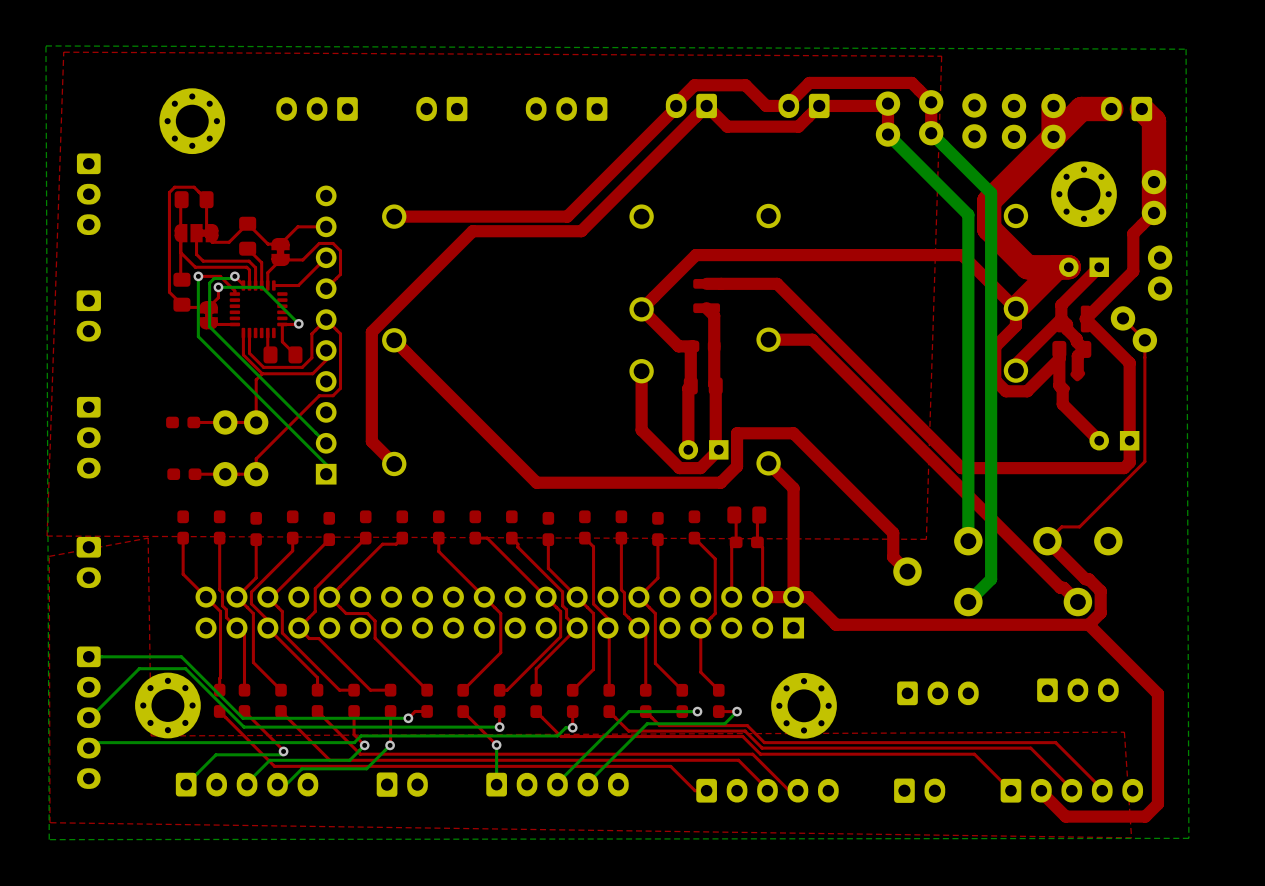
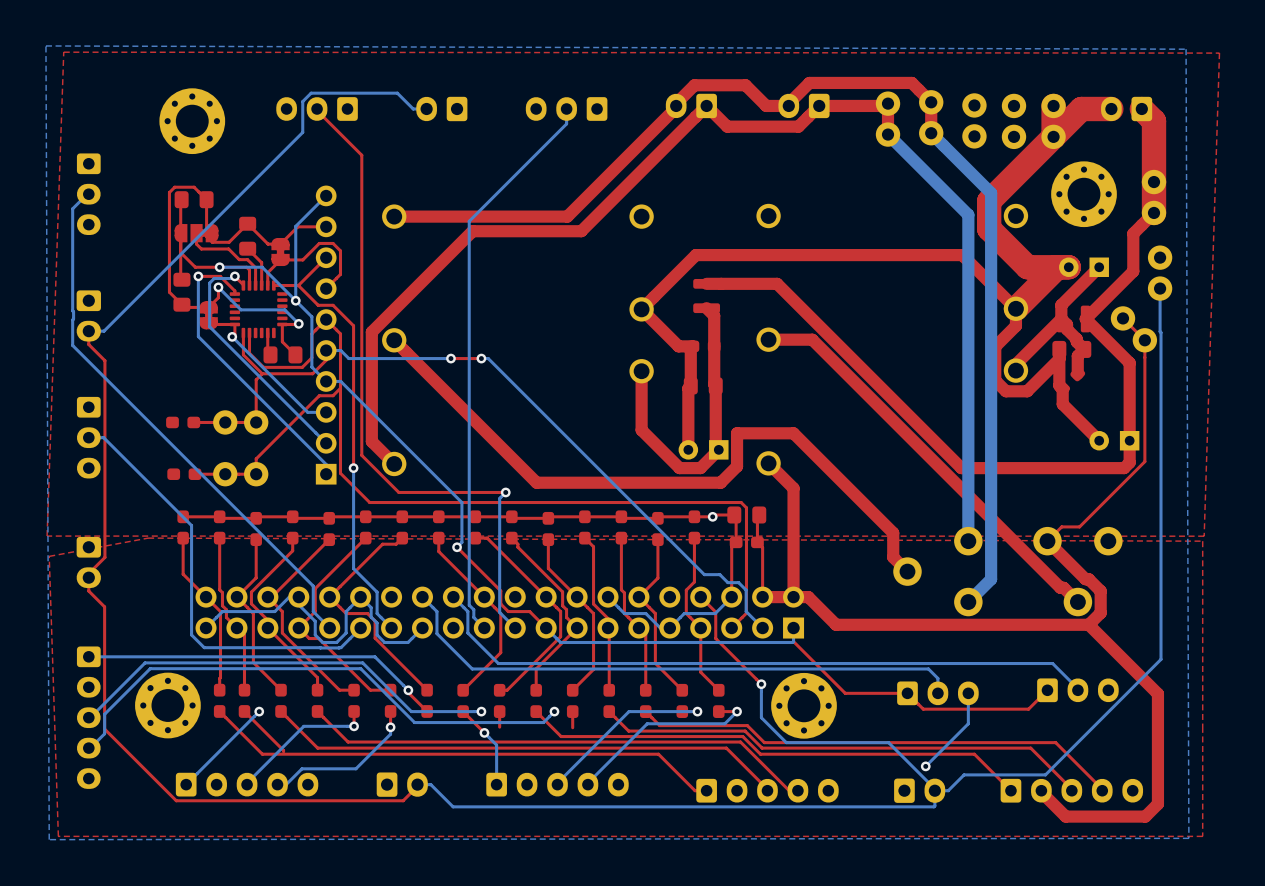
top zone outline: (63, 52) (941, 56) (926, 539) (47, 536) -> (63, 52) (1219, 53) (1204, 536) (47, 536)
top track: none -> (317, 108) (361, 155) (361, 455) (398, 492) (505, 492)
bottom track: none -> (426, 108) (413, 108) (397, 93) (311, 93) (302, 101) (302, 132) (104, 331) (88, 331)
bottom track: none -> (566, 108) (566, 123) (469, 221) (469, 605) (473, 609) (473, 617) (484, 628)
bottom track: none -> (88, 194) (72, 208) (72, 345) (313, 586) (313, 611) (329, 628)
bottom track: none -> (326, 195) (295, 226) (295, 300)
top track: (196, 244) (196, 254) (203, 261) (249, 261) -> (196, 244) (201, 248) (228, 248) (239, 259) (249, 261)
bottom track: none -> (219, 267) (262, 267) (311, 316) (311, 367) (326, 381) (340, 381) (461, 502) (461, 542) (457, 547)
via: none -> (219, 267)
top track: none -> (298, 285) (318, 305) (333, 305) (353, 325) (353, 468)
bottom track: (218, 287) (262, 287) (284, 309) -> (218, 287) (240, 309) (284, 309)
bottom track: none -> (1160, 288) (1161, 659) (1045, 774) (964, 774) (948, 790) (934, 790)
via: none -> (295, 300)
top track: none -> (234, 324) (234, 334) (232, 336)
top track: none -> (88, 331) (88, 344) (104, 360) (104, 557) (88, 573) (88, 591) (104, 606) (104, 729) (176, 800) (403, 800) (417, 784)
bottom track: none -> (232, 336) (307, 412) (326, 412)
via: none -> (232, 336)
bottom track: none -> (326, 350) (340, 350) (348, 358) (450, 358)
via: none -> (450, 358)
top track: none -> (481, 358) (450, 358)
bottom track: none -> (481, 358) (488, 358) (704, 574) (719, 574) (727, 582) (738, 582) (746, 590) (746, 611) (762, 628)
via: none -> (481, 358)
top track: none -> (340, 388) (340, 473) (369, 502) (741, 502) (746, 507) (746, 613) (731, 628)
bottom track: none -> (88, 437) (103, 437) (191, 525) (191, 634) (204, 647) (338, 647) (360, 628)
bottom track: none -> (353, 468) (353, 568) (377, 592) (377, 613) (391, 628)
via: none -> (353, 468)
bottom track: none -> (505, 492) (499, 498) (499, 612) (515, 628)
via: none -> (505, 492)
top track: none -> (734, 514) (657, 518) (183, 516)
via: none -> (712, 516)
top zone outline: (148, 538) (151, 735) (1124, 732) (1131, 837) (49, 822) (49, 556) -> (148, 538) (1202, 541) (1202, 836) (58, 836) (49, 556)
top track: (694, 538) (715, 558) (715, 613) (700, 628) -> (694, 538) (694, 582) (686, 590) (686, 613) (700, 628)
top track: none -> (457, 547) (500, 590) (500, 604) (508, 611) (529, 611) (546, 628)
via: none -> (457, 547)
bottom track: none -> (422, 597) (436, 611) (436, 633) (472, 668) (928, 668) (937, 678) (937, 693)
bottom track: none -> (453, 597) (467, 611) (467, 632) (498, 663) (1052, 663) (1077, 690)
top track: none -> (700, 597) (715, 612) (715, 638) (761, 684)
bottom track: none -> (731, 597) (715, 613) (684, 613) (669, 628) (660, 628) (645, 613) (624, 613) (608, 597)
bottom track: none -> (422, 628) (408, 642) (384, 642) (377, 634) (377, 623) (371, 617) (371, 607) (360, 597) (346, 611) (346, 632) (336, 642) (322, 642) (315, 634) (315, 621) (298, 604) (298, 597) (289, 597) (274, 611) (222, 611) (206, 628)
top track: none -> (793, 628) (793, 641) (845, 693) (907, 693) (923, 709) (1028, 709) (1047, 690)
bottom track: none -> (793, 628) (792, 642) (560, 642) (546, 628)
bottom track: (181, 656) (242, 718) (408, 718) -> (181, 656) (374, 656) (408, 690)
bottom track: none -> (139, 668) (145, 662) (362, 662) (411, 711) (481, 711)
bottom track: (150, 668) (139, 668) -> (150, 668) (104, 714) (104, 733) (95, 742)
bottom track: (185, 668) (244, 727) (499, 727) -> (185, 668) (360, 668) (414, 722) (543, 722) (554, 711)
bottom track: none -> (761, 684) (761, 717) (786, 742) (888, 742) (934, 788) (934, 805) (453, 806) (430, 784) (417, 784)
via: none -> (761, 684)
via: none -> (408, 690)
bottom track: none -> (968, 693) (968, 723) (925, 766)
via: none -> (259, 711)
top track: (427, 711) (415, 711) (408, 718) -> (427, 711) (408, 692) (408, 690)
via: none -> (481, 711)
via: (408, 718) -> none
top track: (354, 726) (354, 734) (364, 745) -> none
via: none -> (354, 726)
top track: (390, 727) (390, 745) -> none
via: none -> (390, 727)
via: (499, 727) -> none
bottom track: (572, 727) (565, 727) (557, 735) (361, 735) (354, 742) (95, 742) -> none
via position: (572, 727) -> (554, 711)
top track: (484, 732) (496, 745) -> none
bottom track: none -> (484, 732) (496, 745)
via: none -> (484, 732)
top track: (348, 742) (360, 754) -> (262, 754) (360, 754)
top track: none -> (348, 742) (740, 742) (752, 754)
bottom track: (364, 745) (349, 760) (269, 760) -> (354, 726) (303, 726) (269, 760)
via: (364, 745) -> none
bottom track: (390, 745) (366, 768) (355, 768) -> (390, 727) (390, 734) (355, 768)
via: (390, 745) -> none
via: (496, 745) -> none
top track: (317, 748) (329, 760) (738, 760) -> (317, 748) (726, 748) (738, 760)
bottom track: (283, 751) (282, 754) (216, 754) -> (259, 711) (216, 754)
via: (283, 751) -> none
top track: (262, 754) (274, 766) (670, 766) -> none
top track: (752, 754) (658, 754) -> (670, 766) (658, 754)
via: none -> (925, 766)

